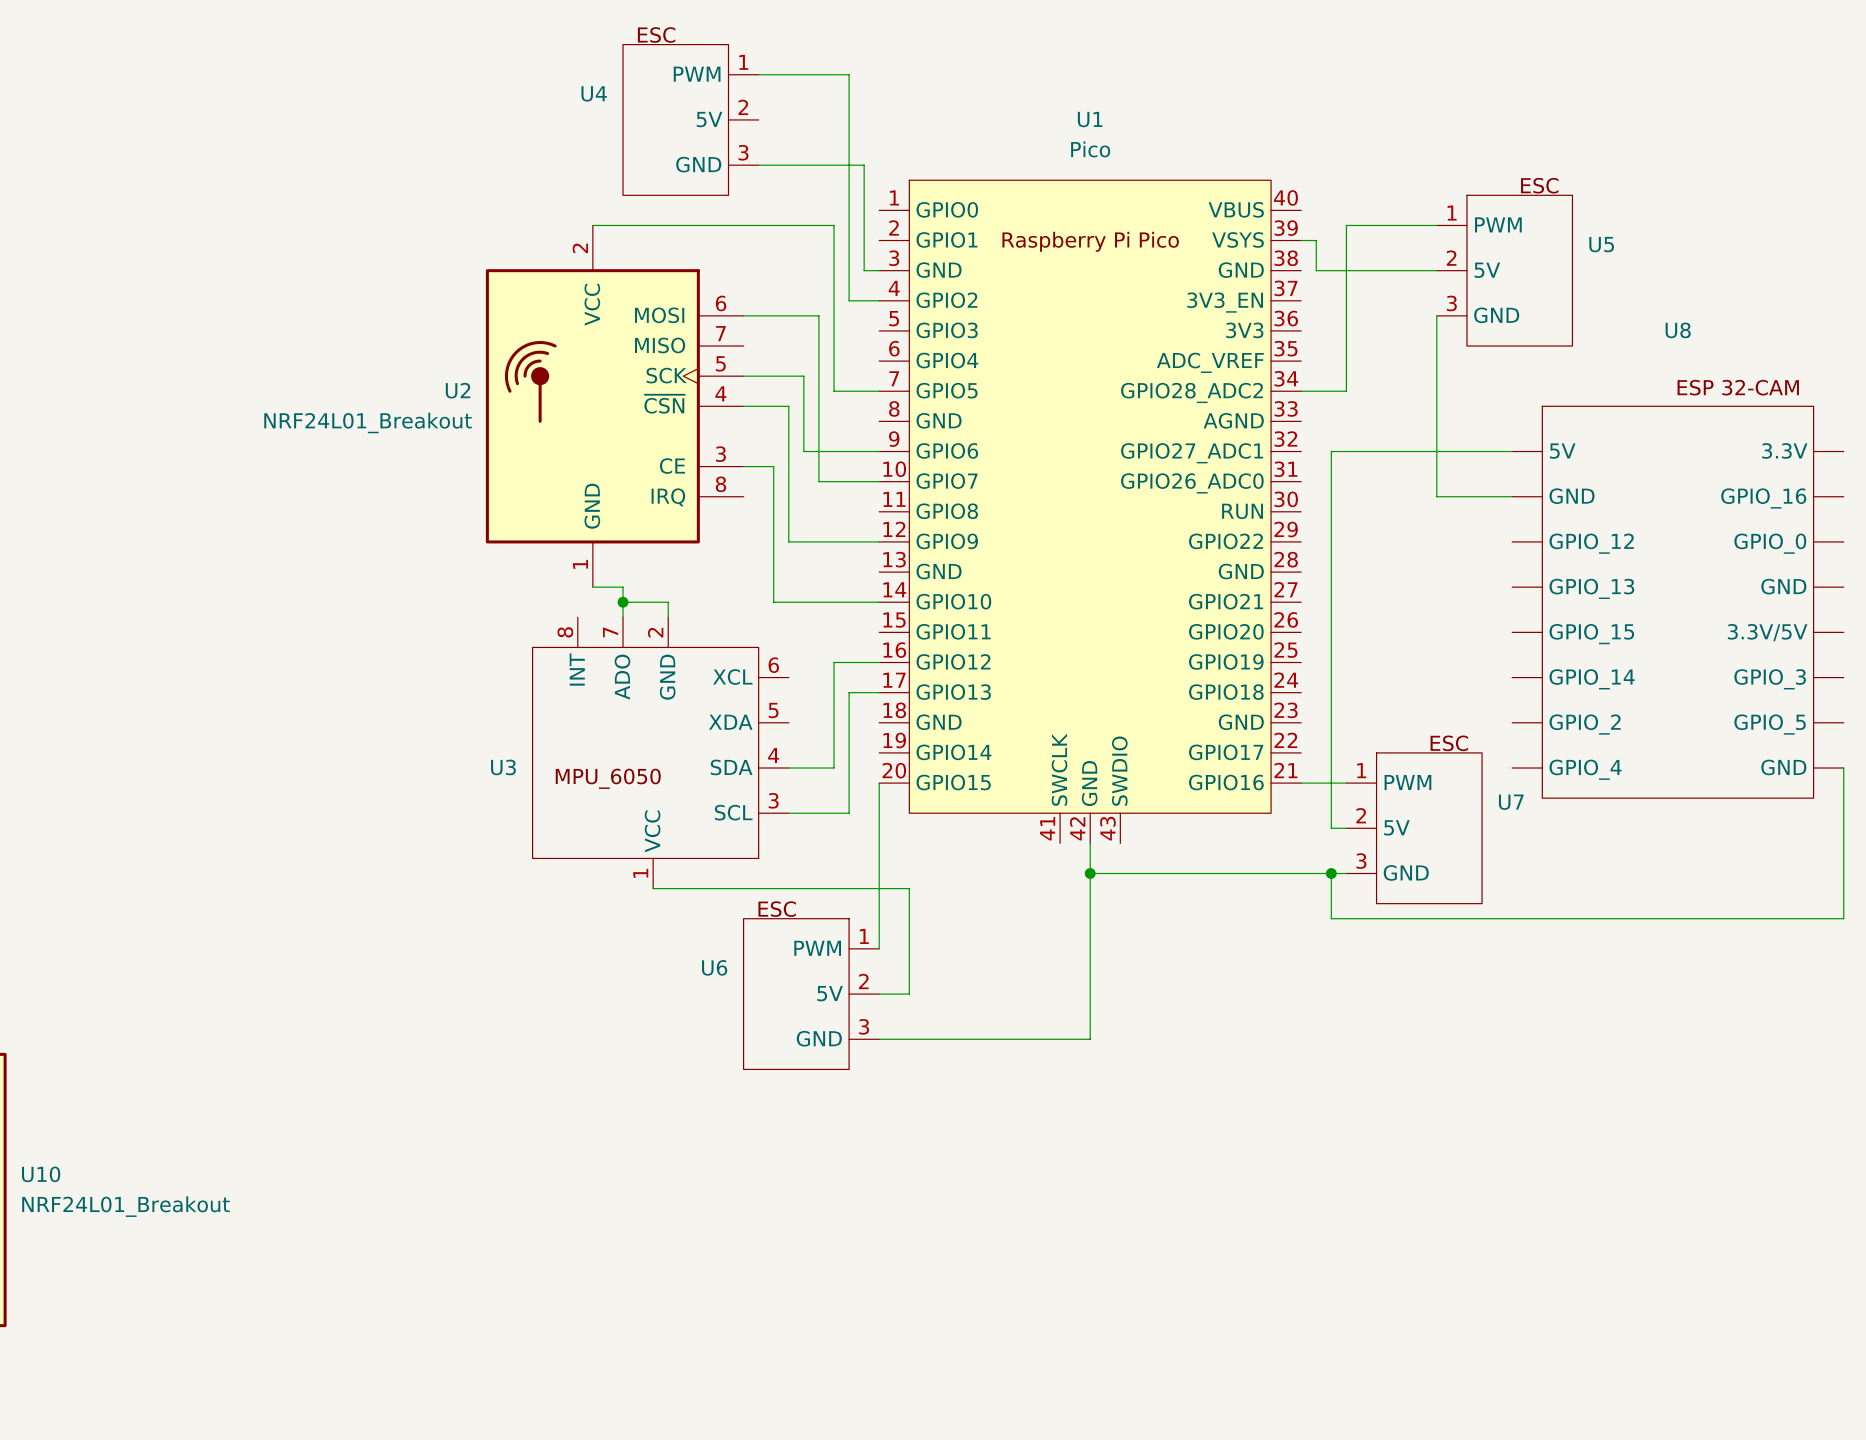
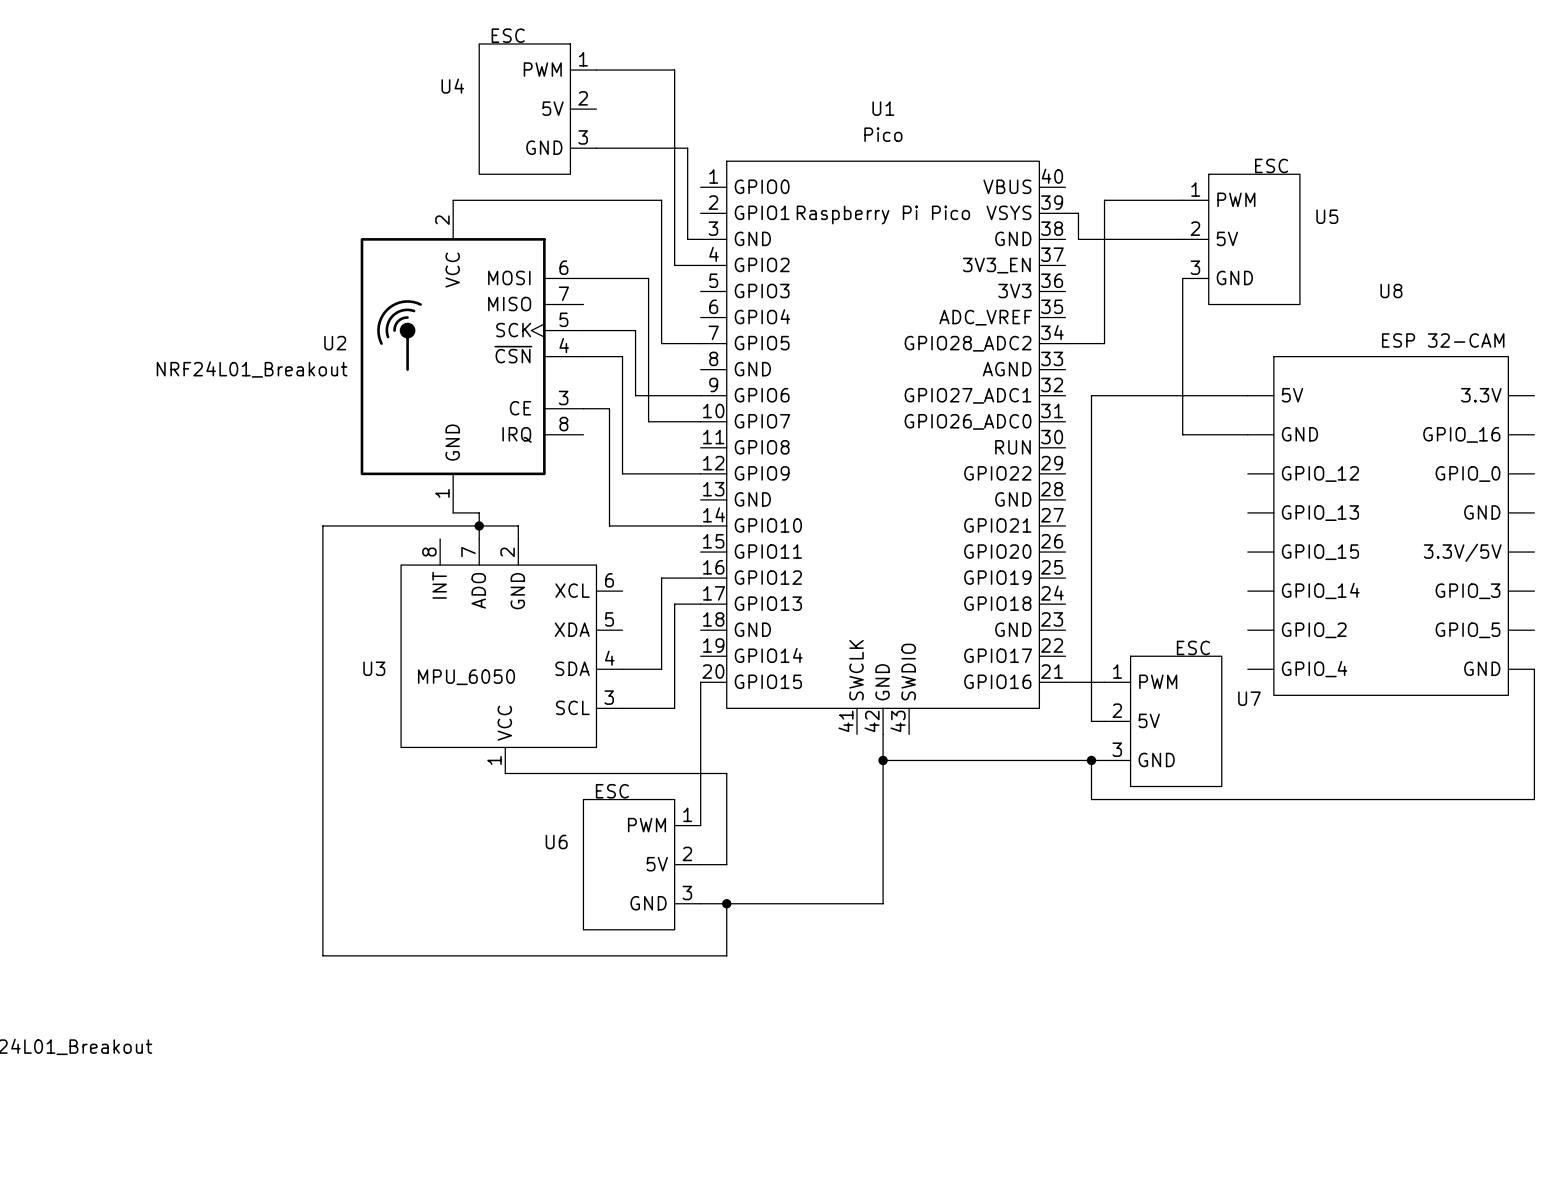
wire: none -> (479, 525) (322, 525) (322, 955) (726, 955) (726, 903)
junction: none -> (726, 903)

